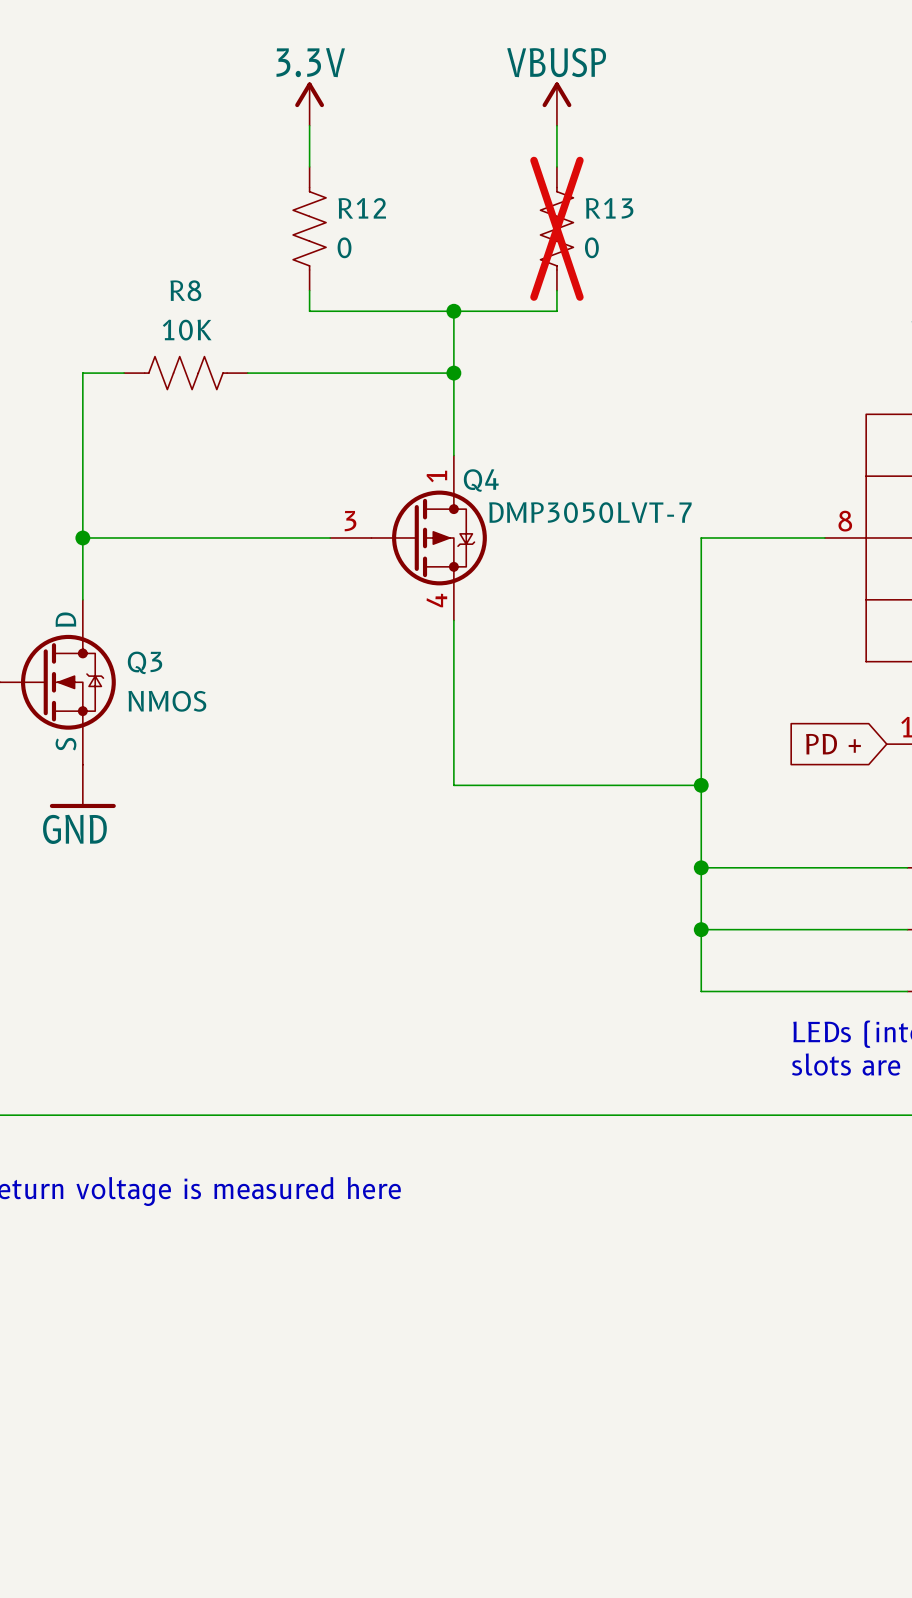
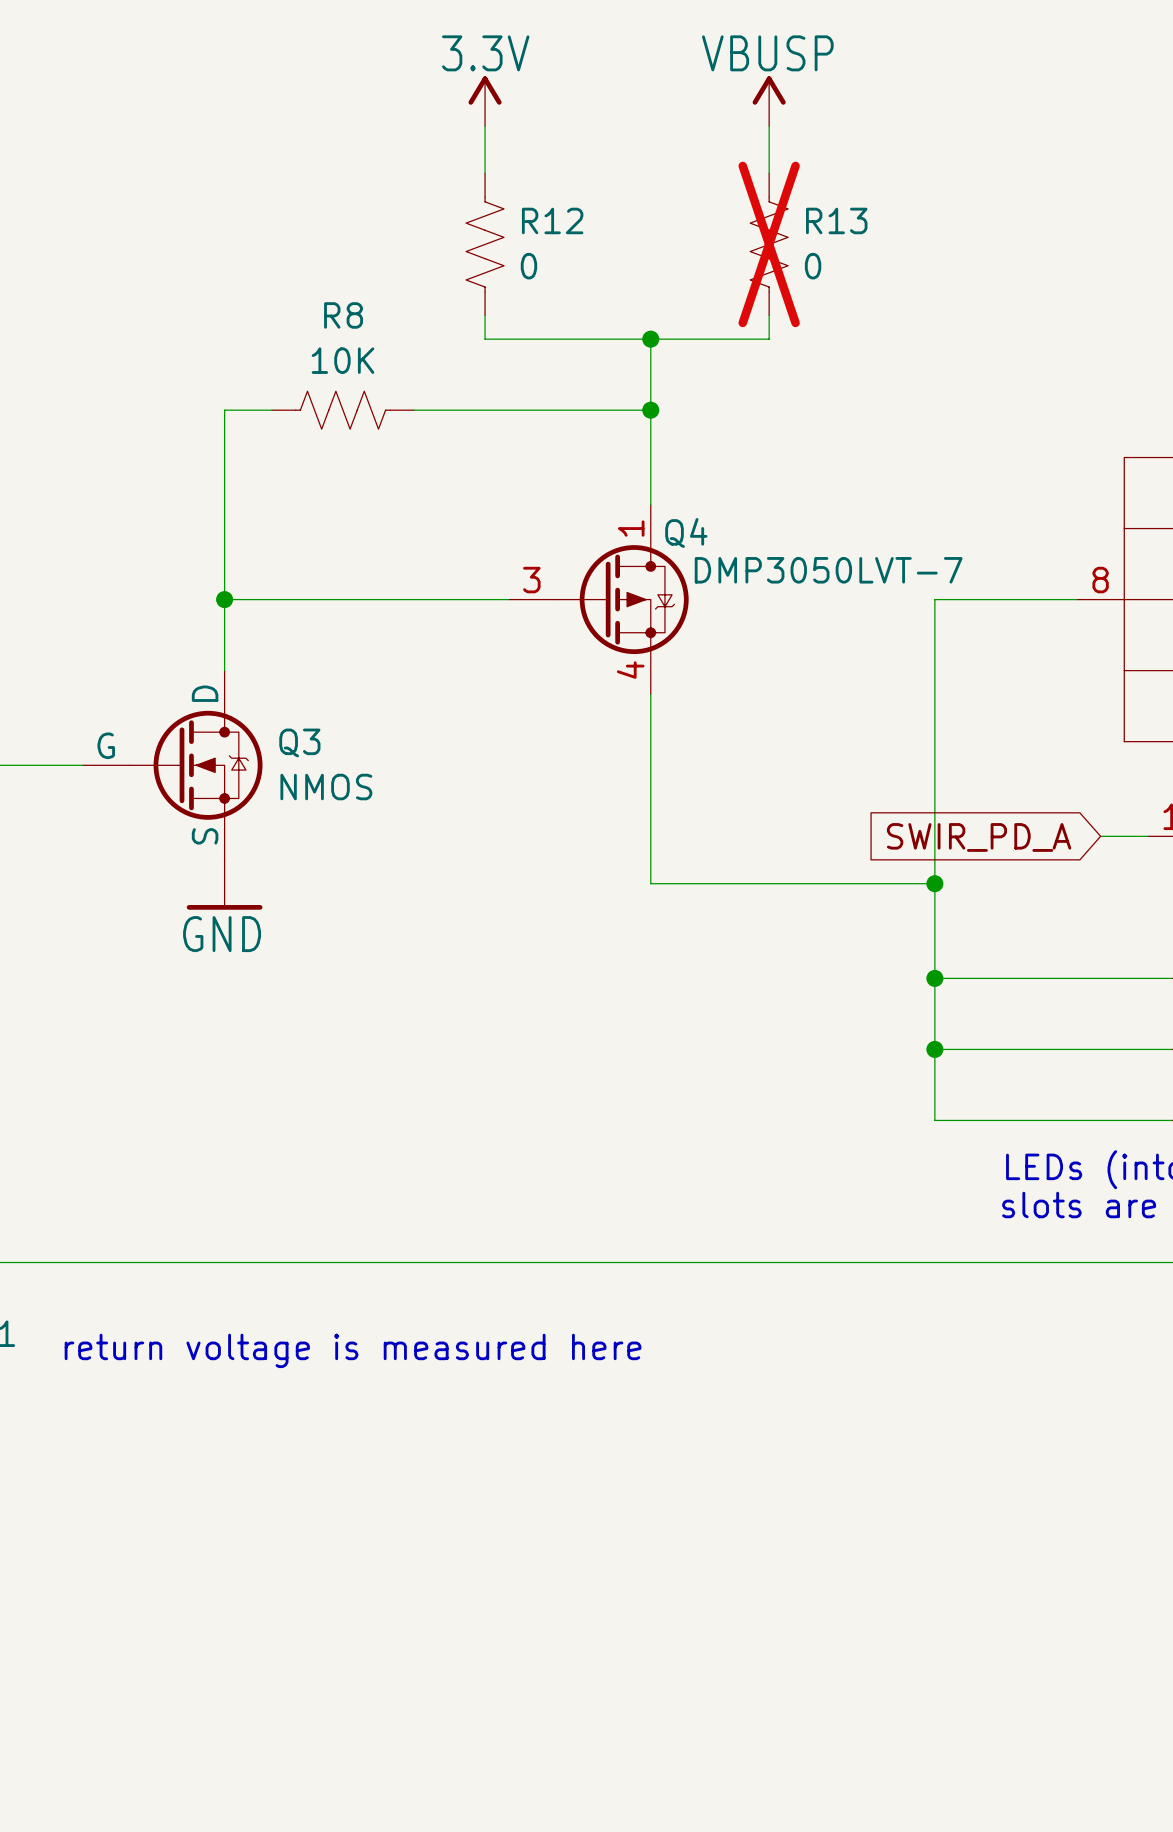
global label: PD + (833, 744) -> none
wire: none -> (1100, 836) (1147, 836)
global label: none -> SWIR_PD_A (979, 837)

